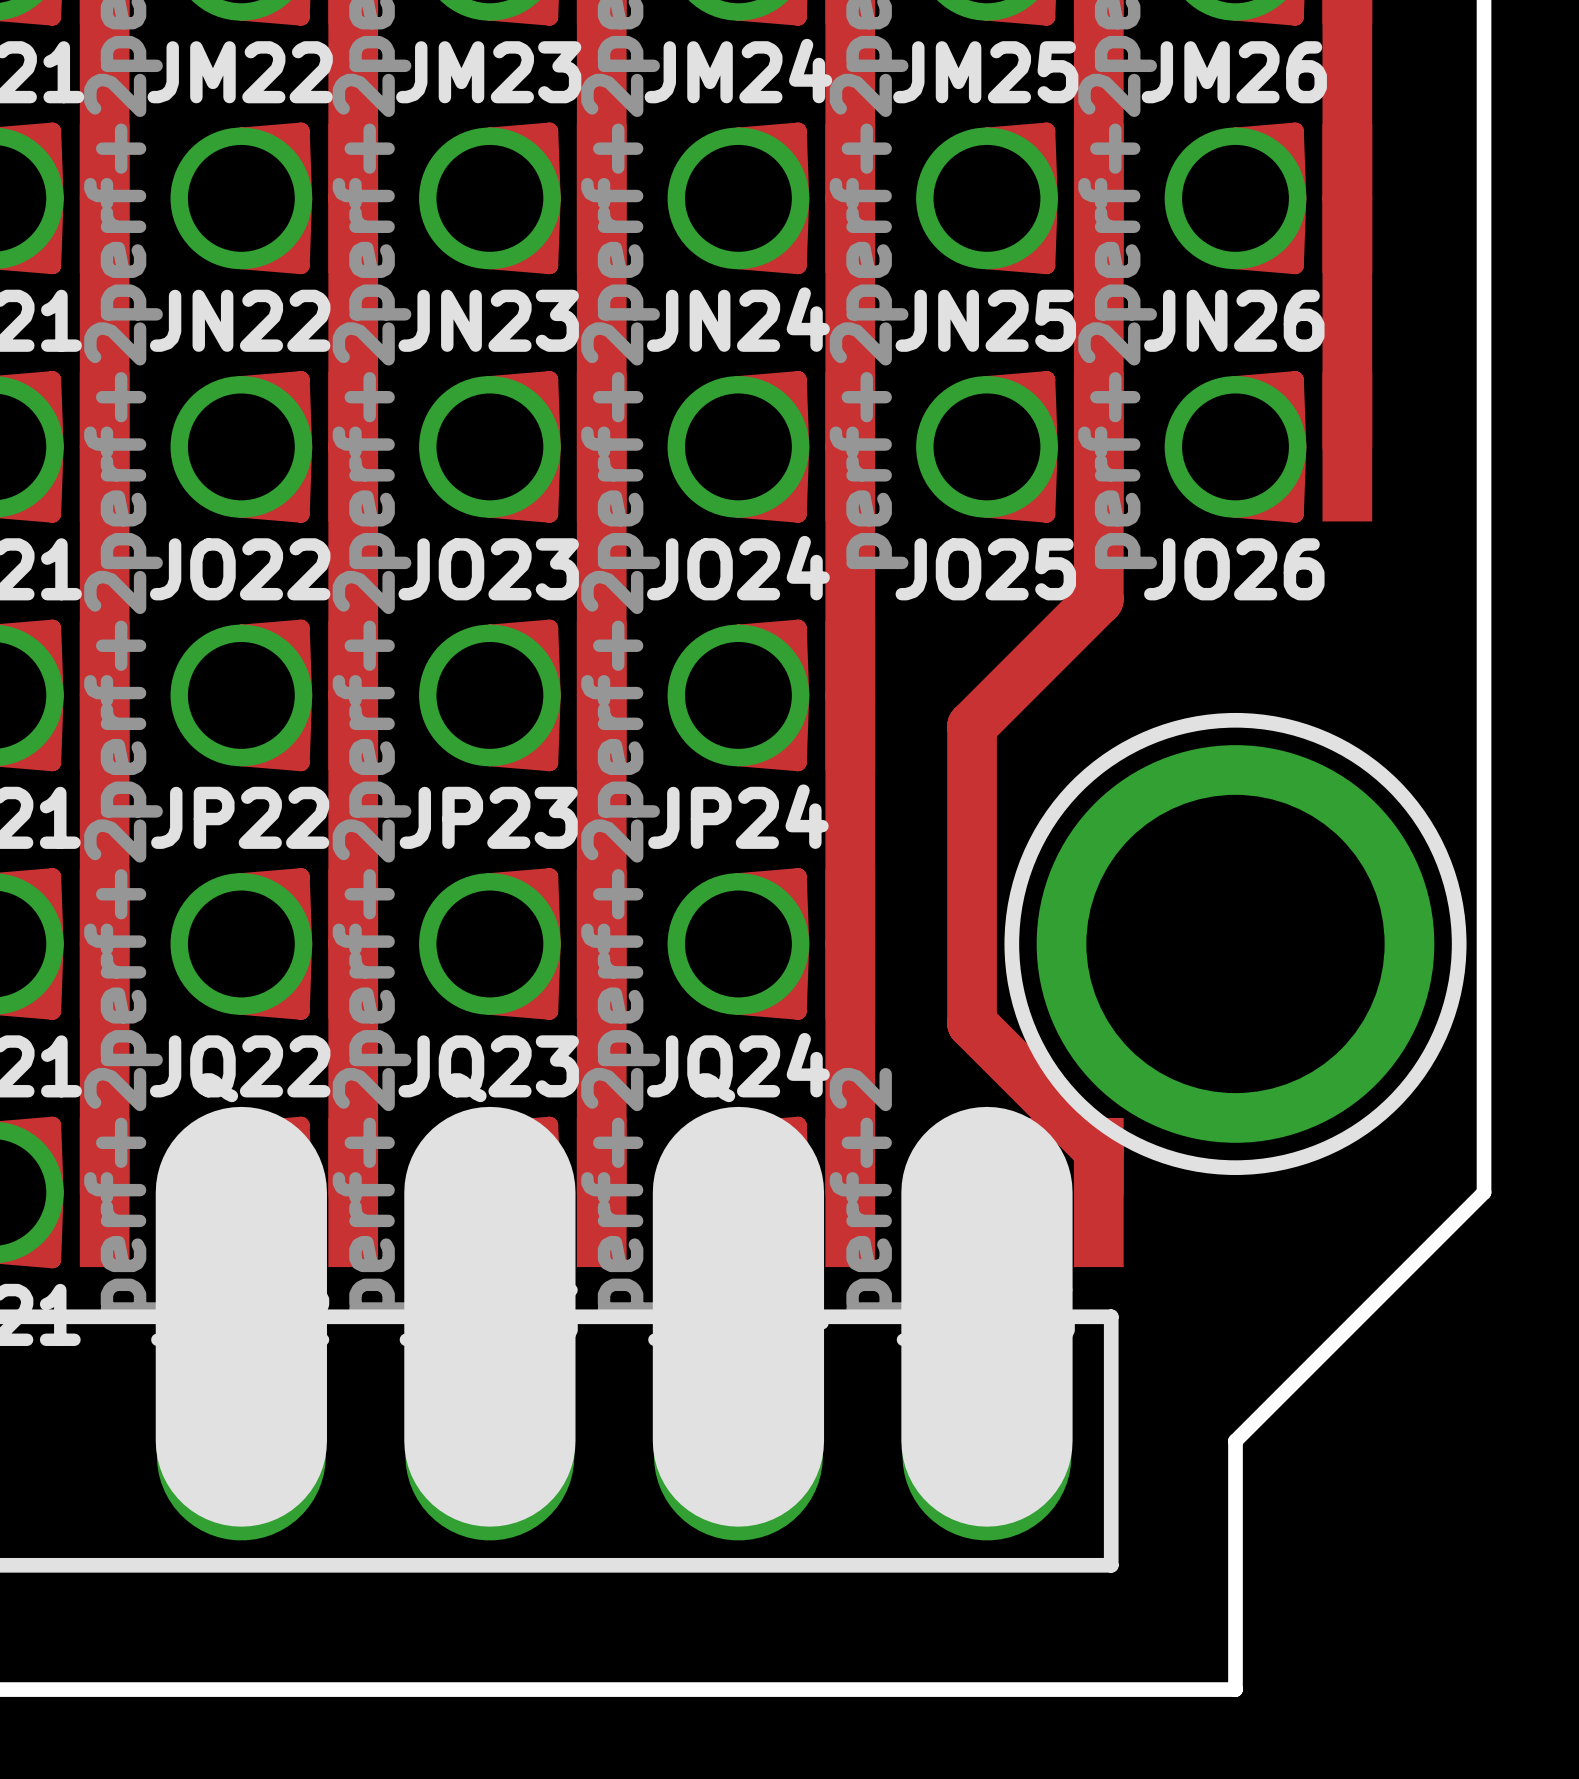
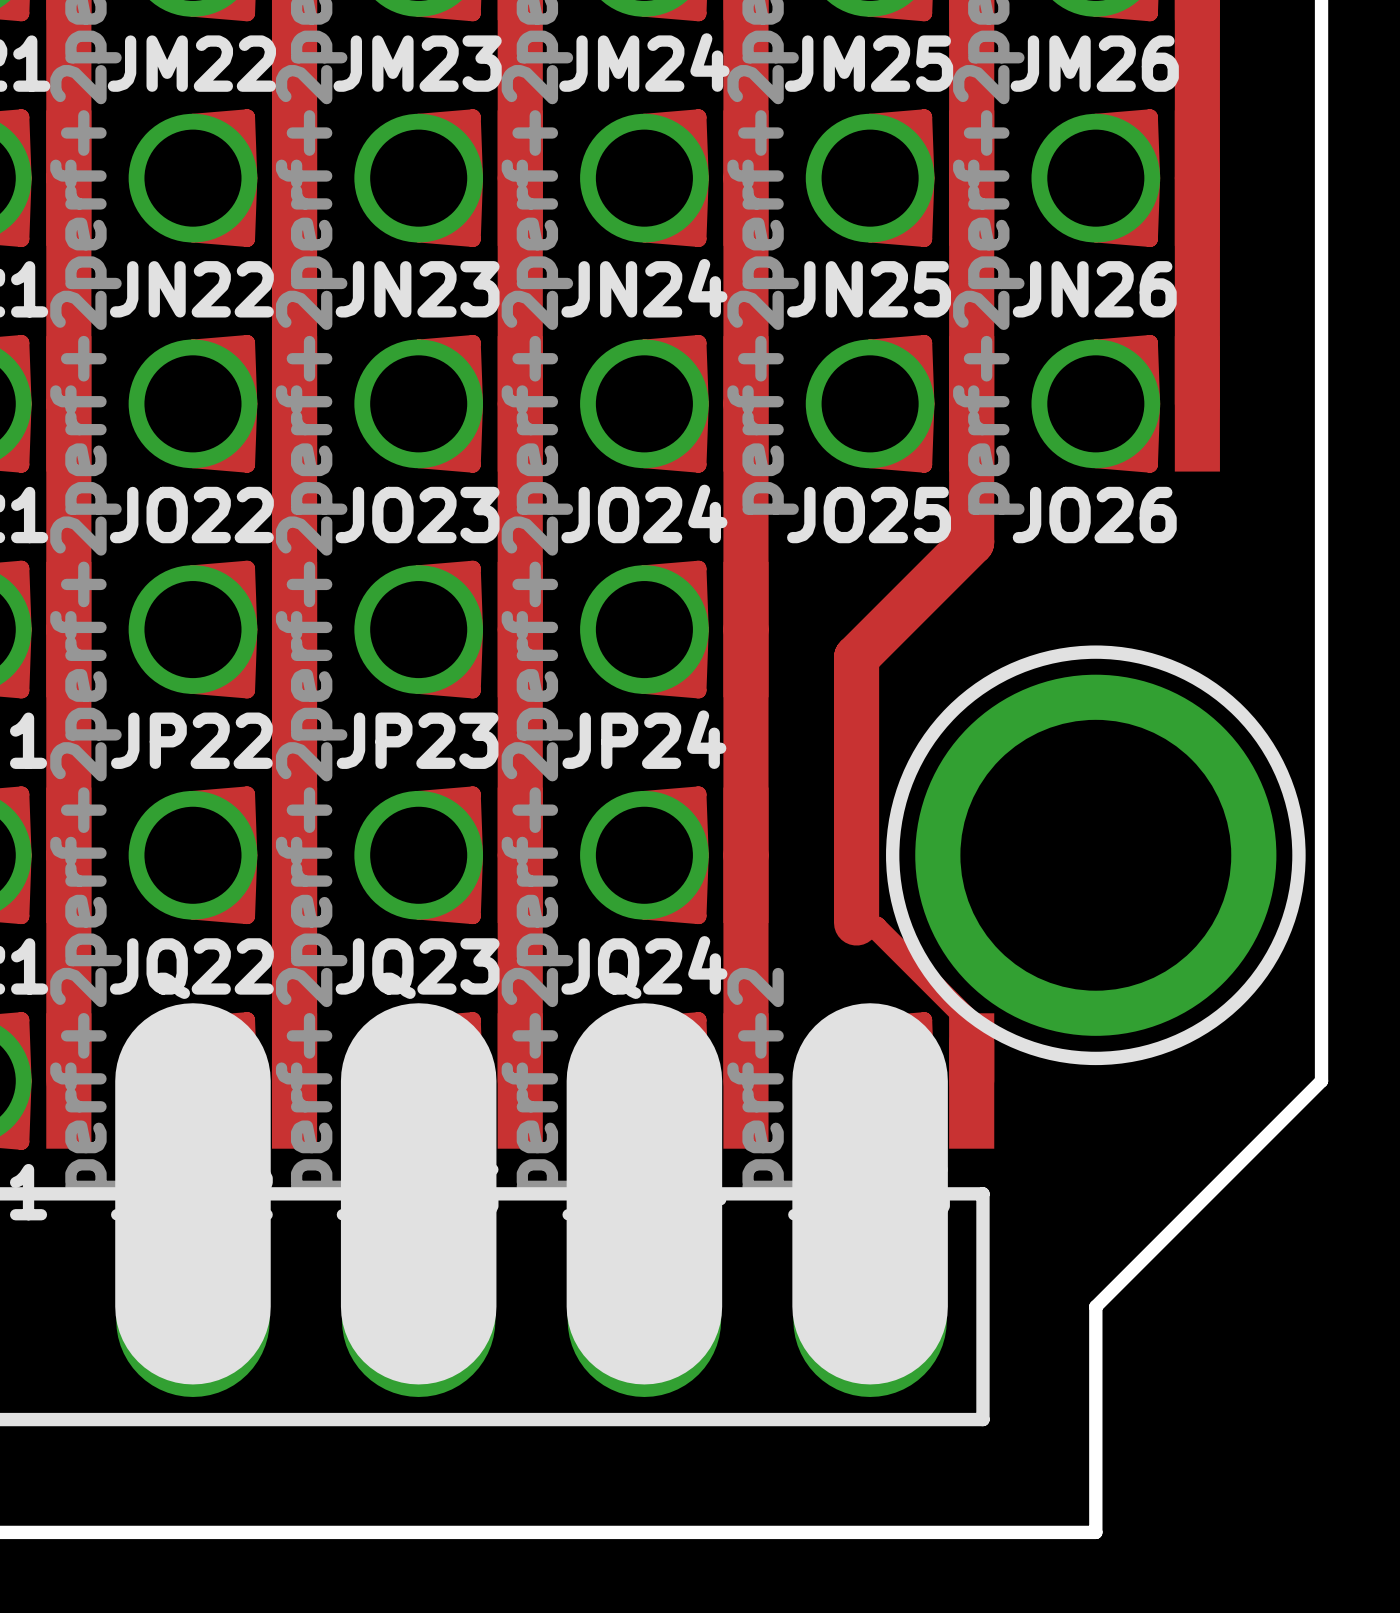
track: (972, 1018) (972, 1023) (1098, 1150) -> (856, 927) (875, 927) (971, 1023) (971, 1042)

